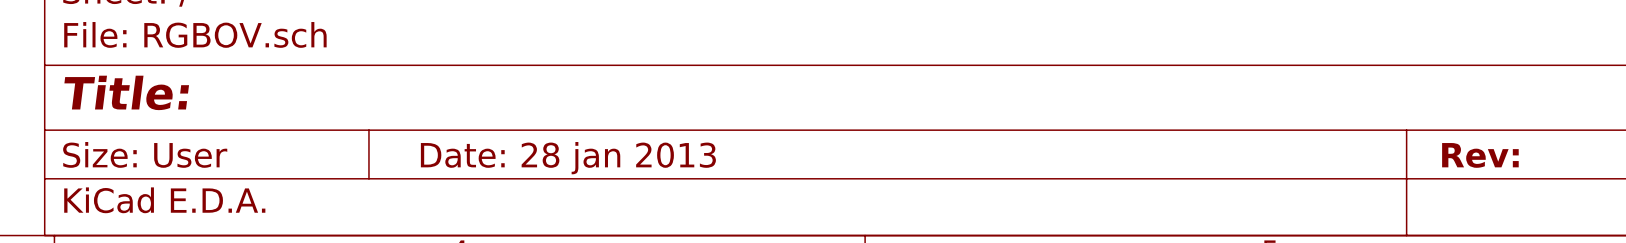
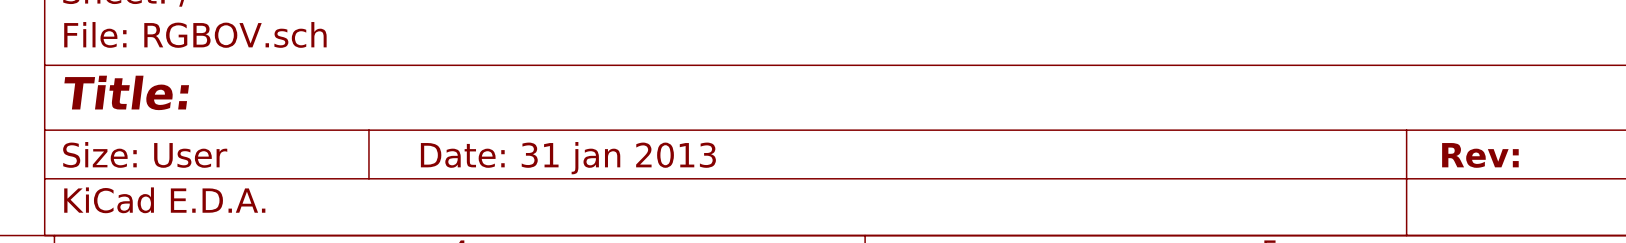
title block: Date: 28 jan 2013 (568, 158) -> Date: 31 jan 2013 (568, 158)

